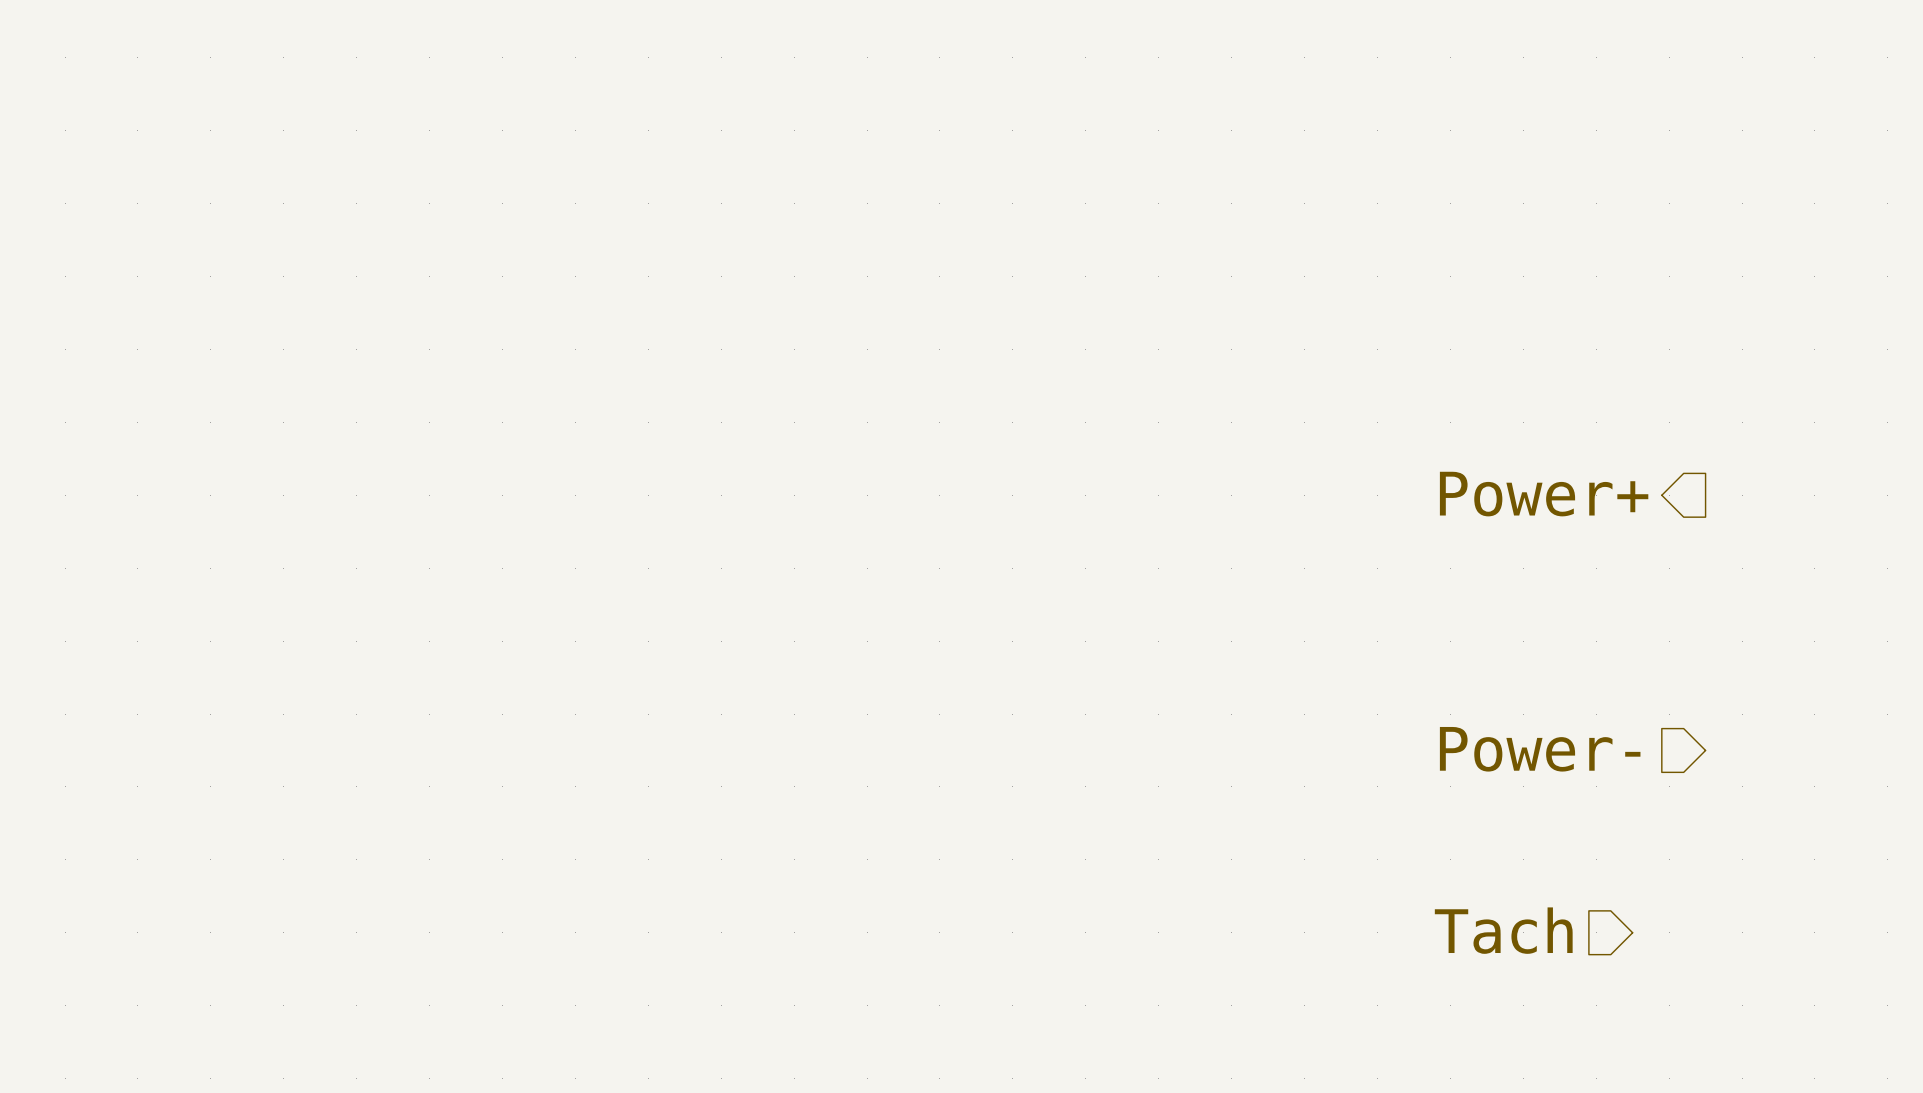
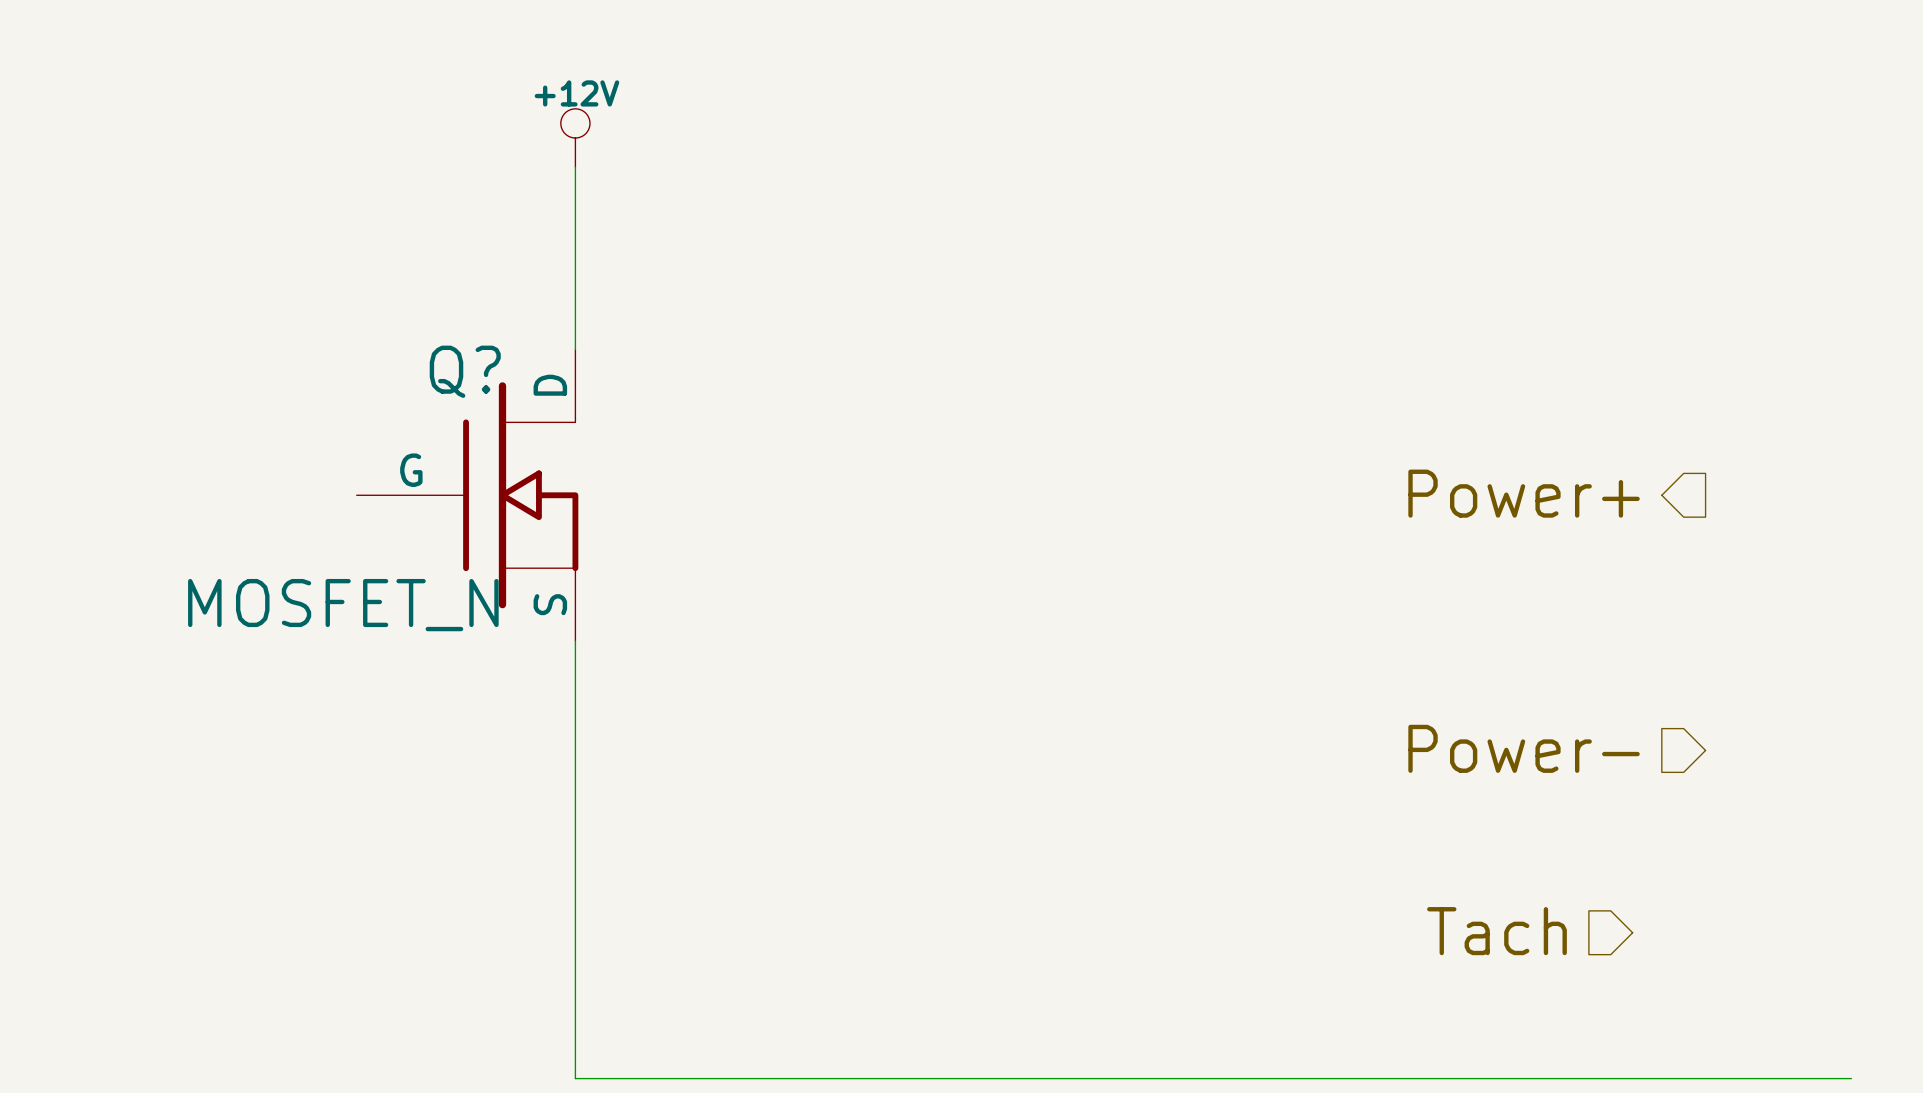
power symbol: none -> +12V (575, 138)
wire: none -> (575, 167) (575, 349)
Q?: none -> MOSFET_N (467, 495)
wire: none -> (575, 641) (575, 1078) (1851, 1078)

